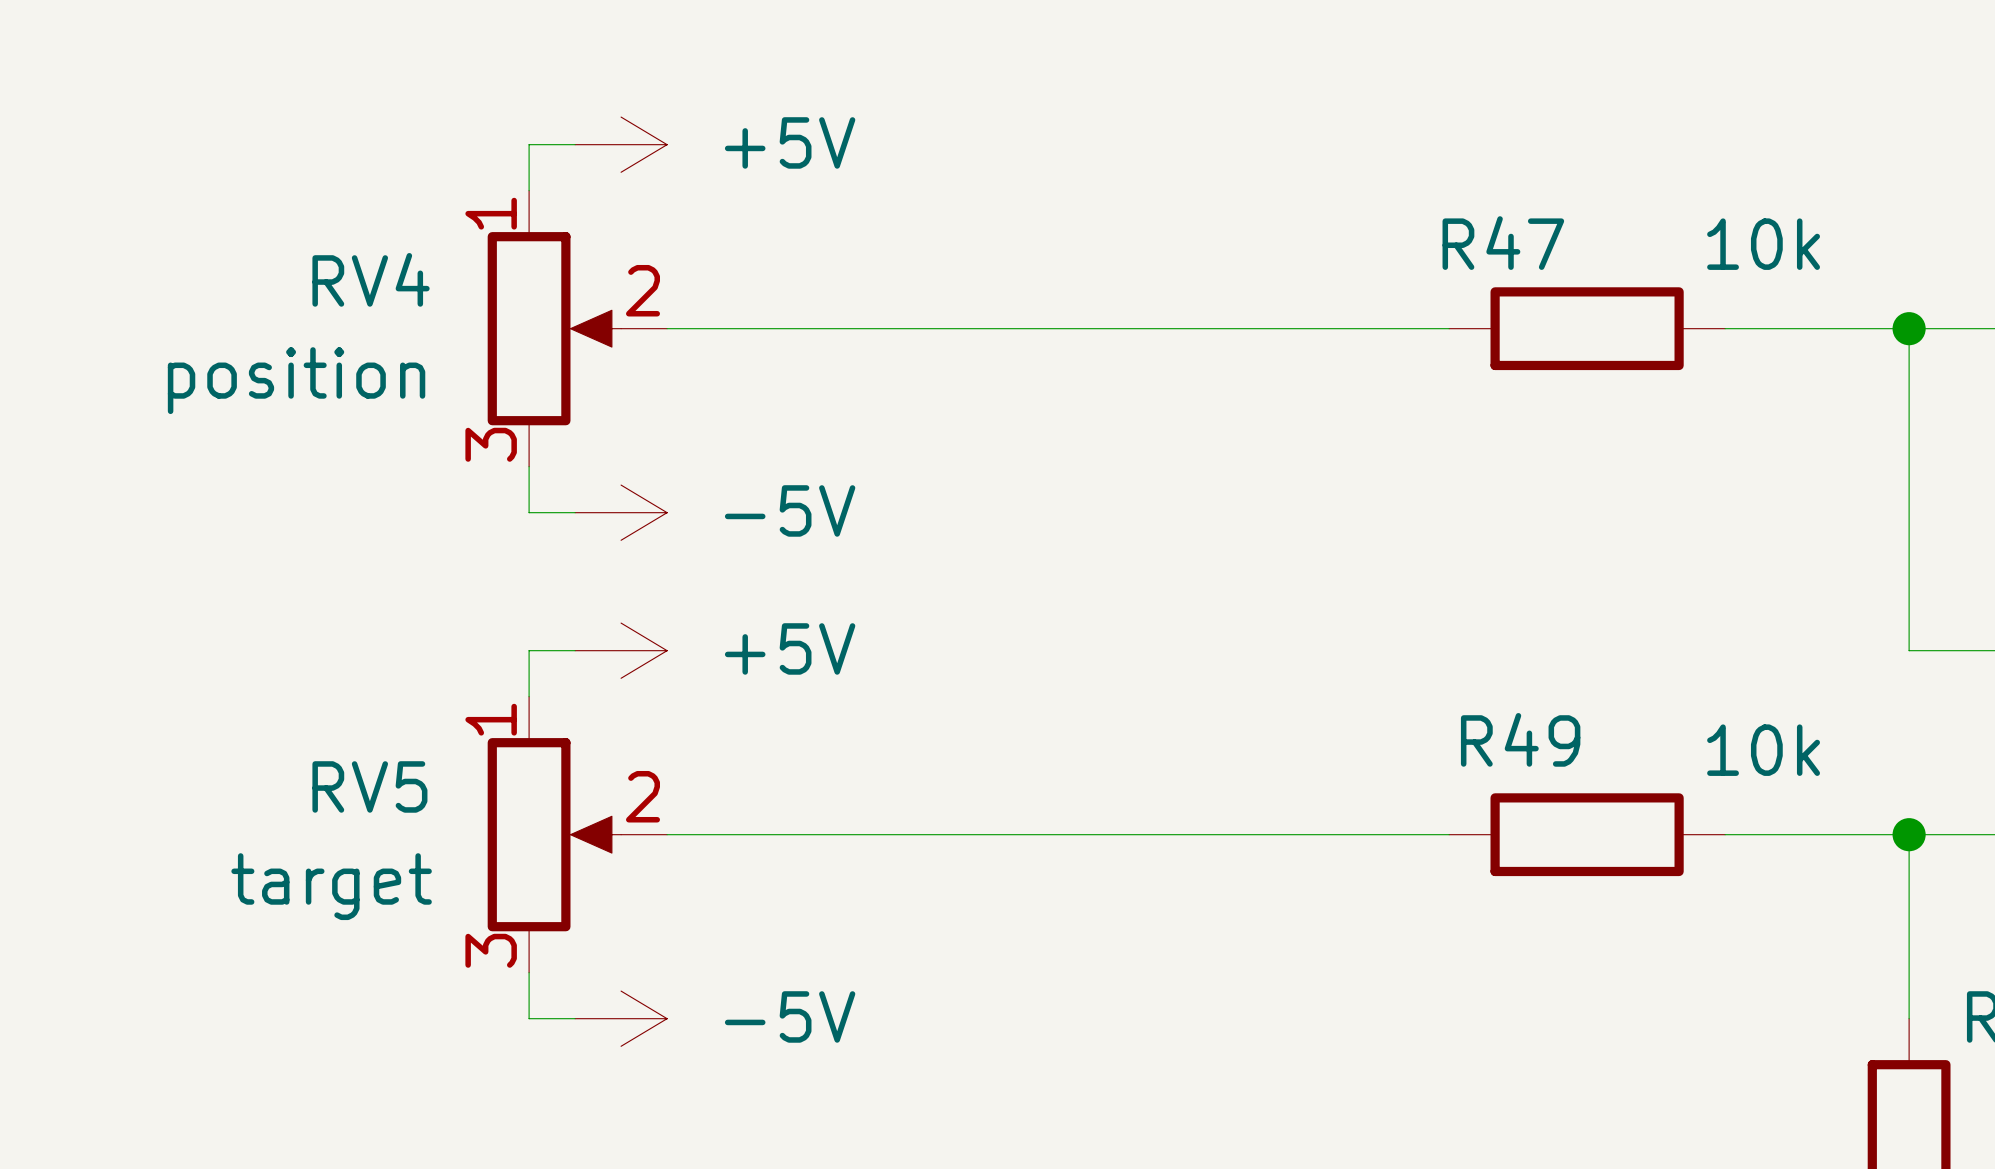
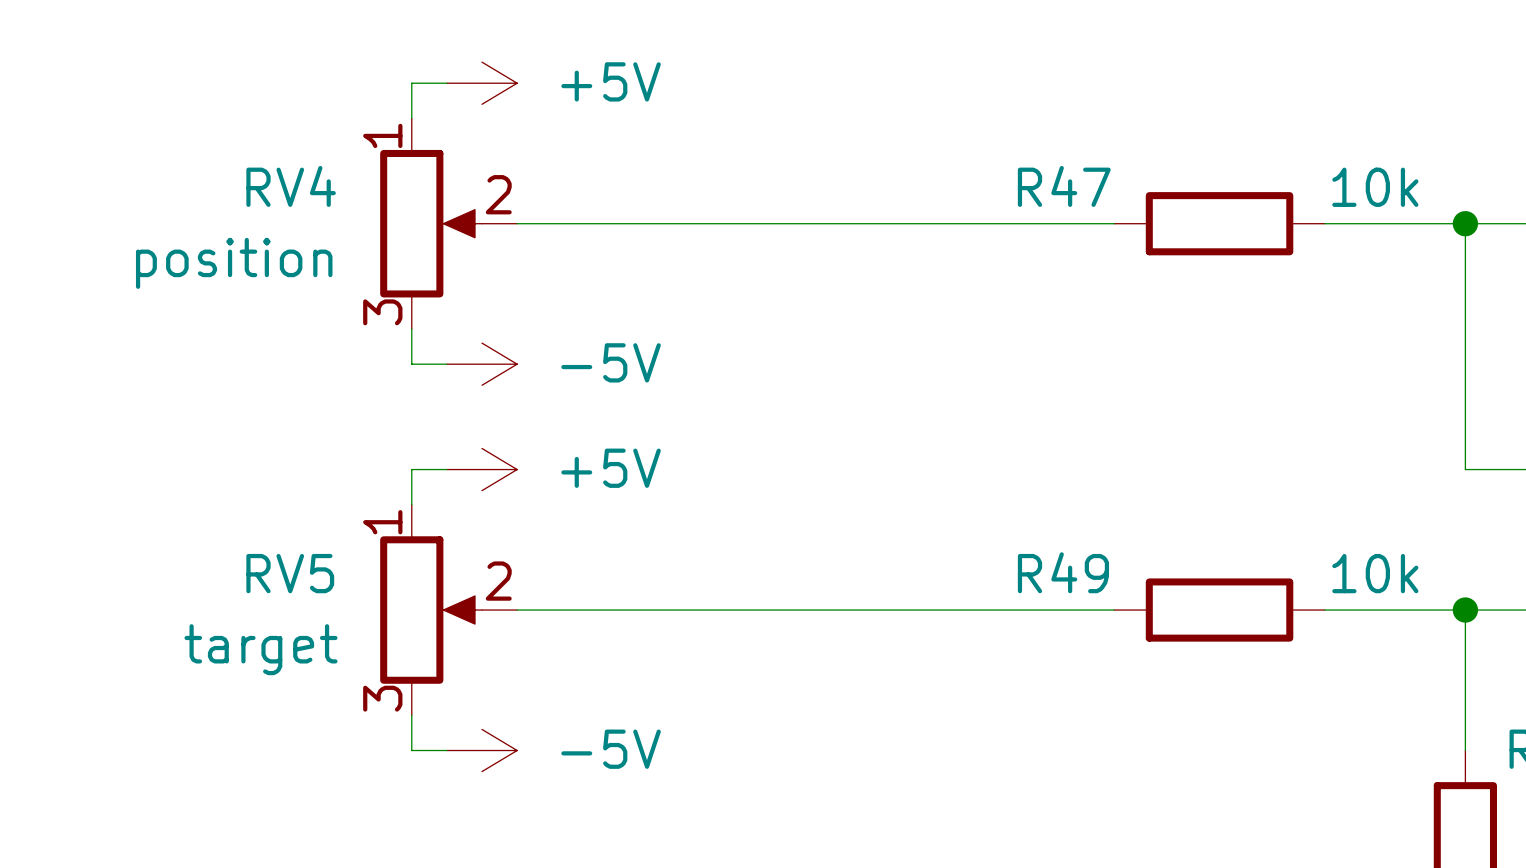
R47 name position: R47 (1503, 243) -> R47 (1064, 186)
R47 value position: 10k (1763, 244) -> 10k (1375, 187)
R49 name position: R49 (1520, 739) -> R49 (1063, 572)
R49 value position: 10k (1763, 750) -> 10k (1375, 573)

